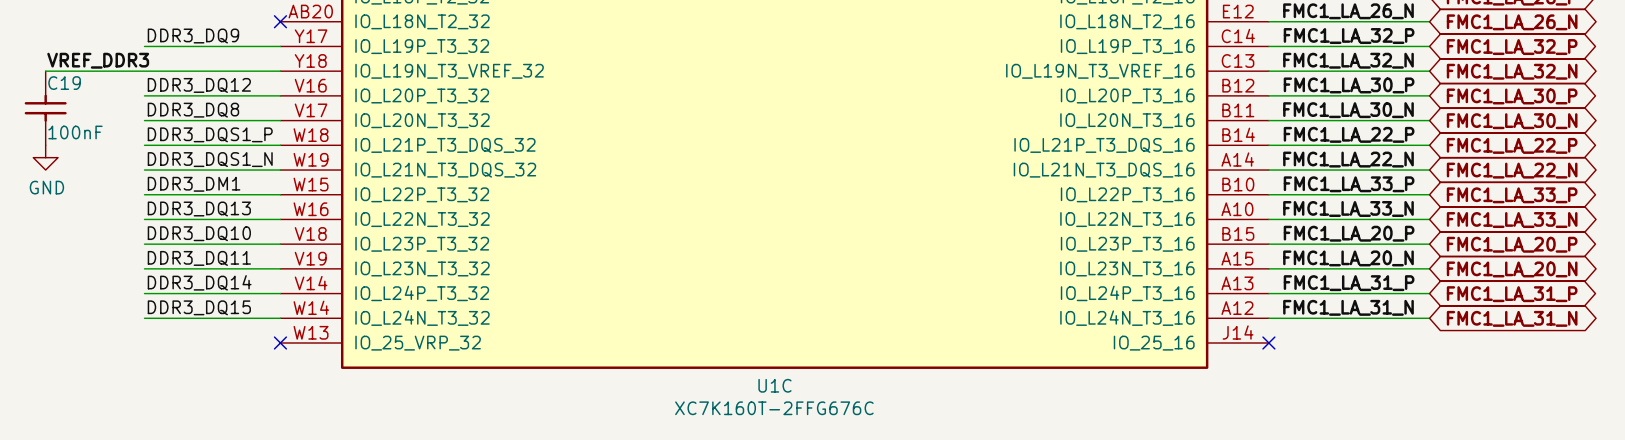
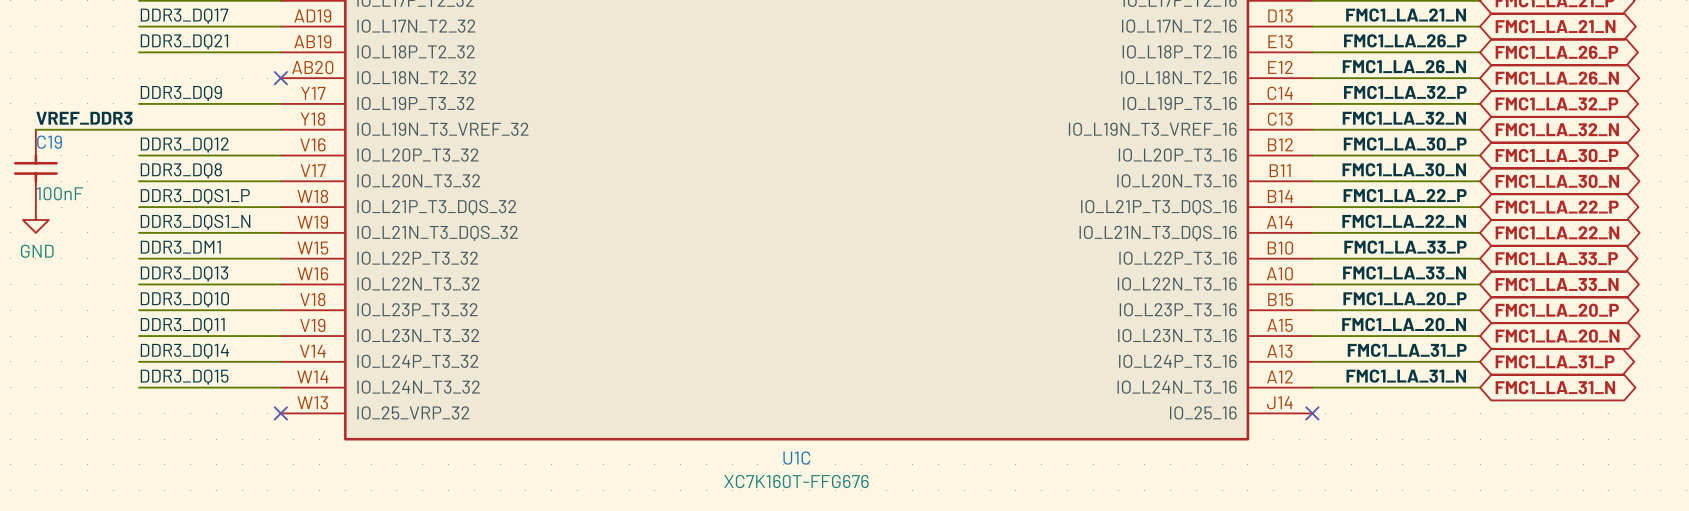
U1C value: XC7K160T-2FFG676C (774, 408) -> XC7K160T-FFG676 (796, 481)

